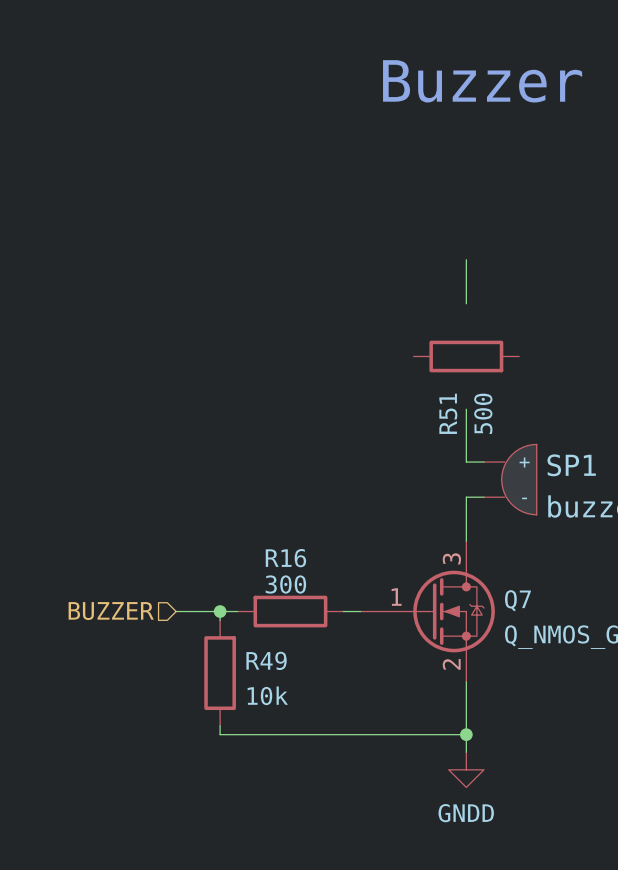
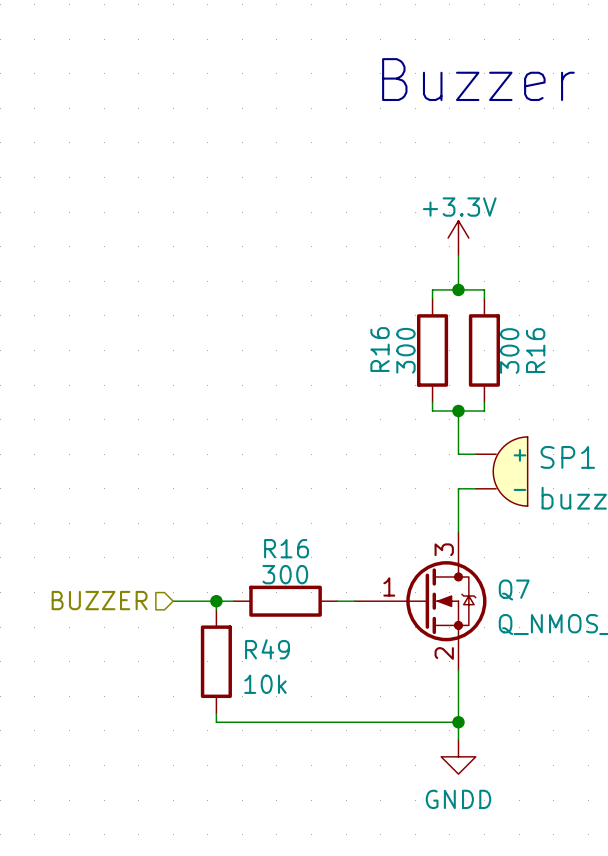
power symbol: none -> +3.3V (458, 238)
junction: none -> (458, 289)
wire: none -> (432, 298) (432, 289) (484, 289) (484, 298)
R16: none -> 300 (432, 350)
R51: 500 (466, 356) -> none
R16: none -> 300 (484, 350)
wire: none -> (432, 402) (432, 410) (484, 410) (484, 402)
junction: none -> (458, 410)

